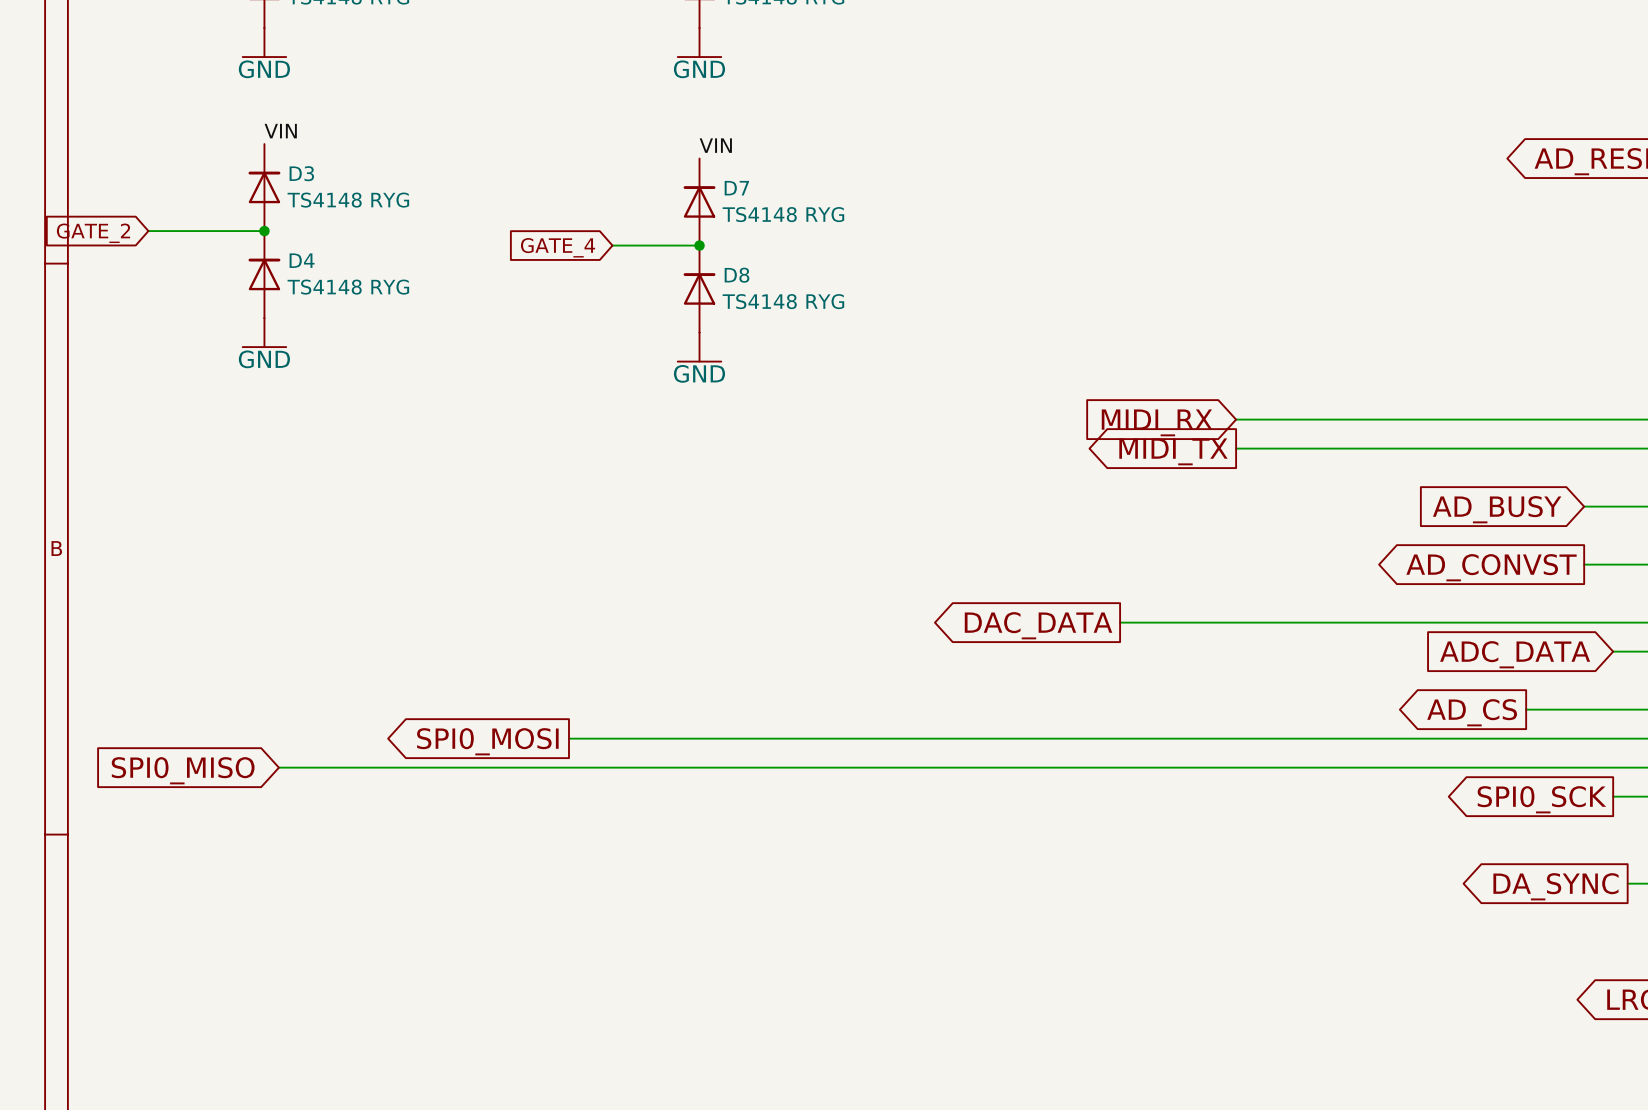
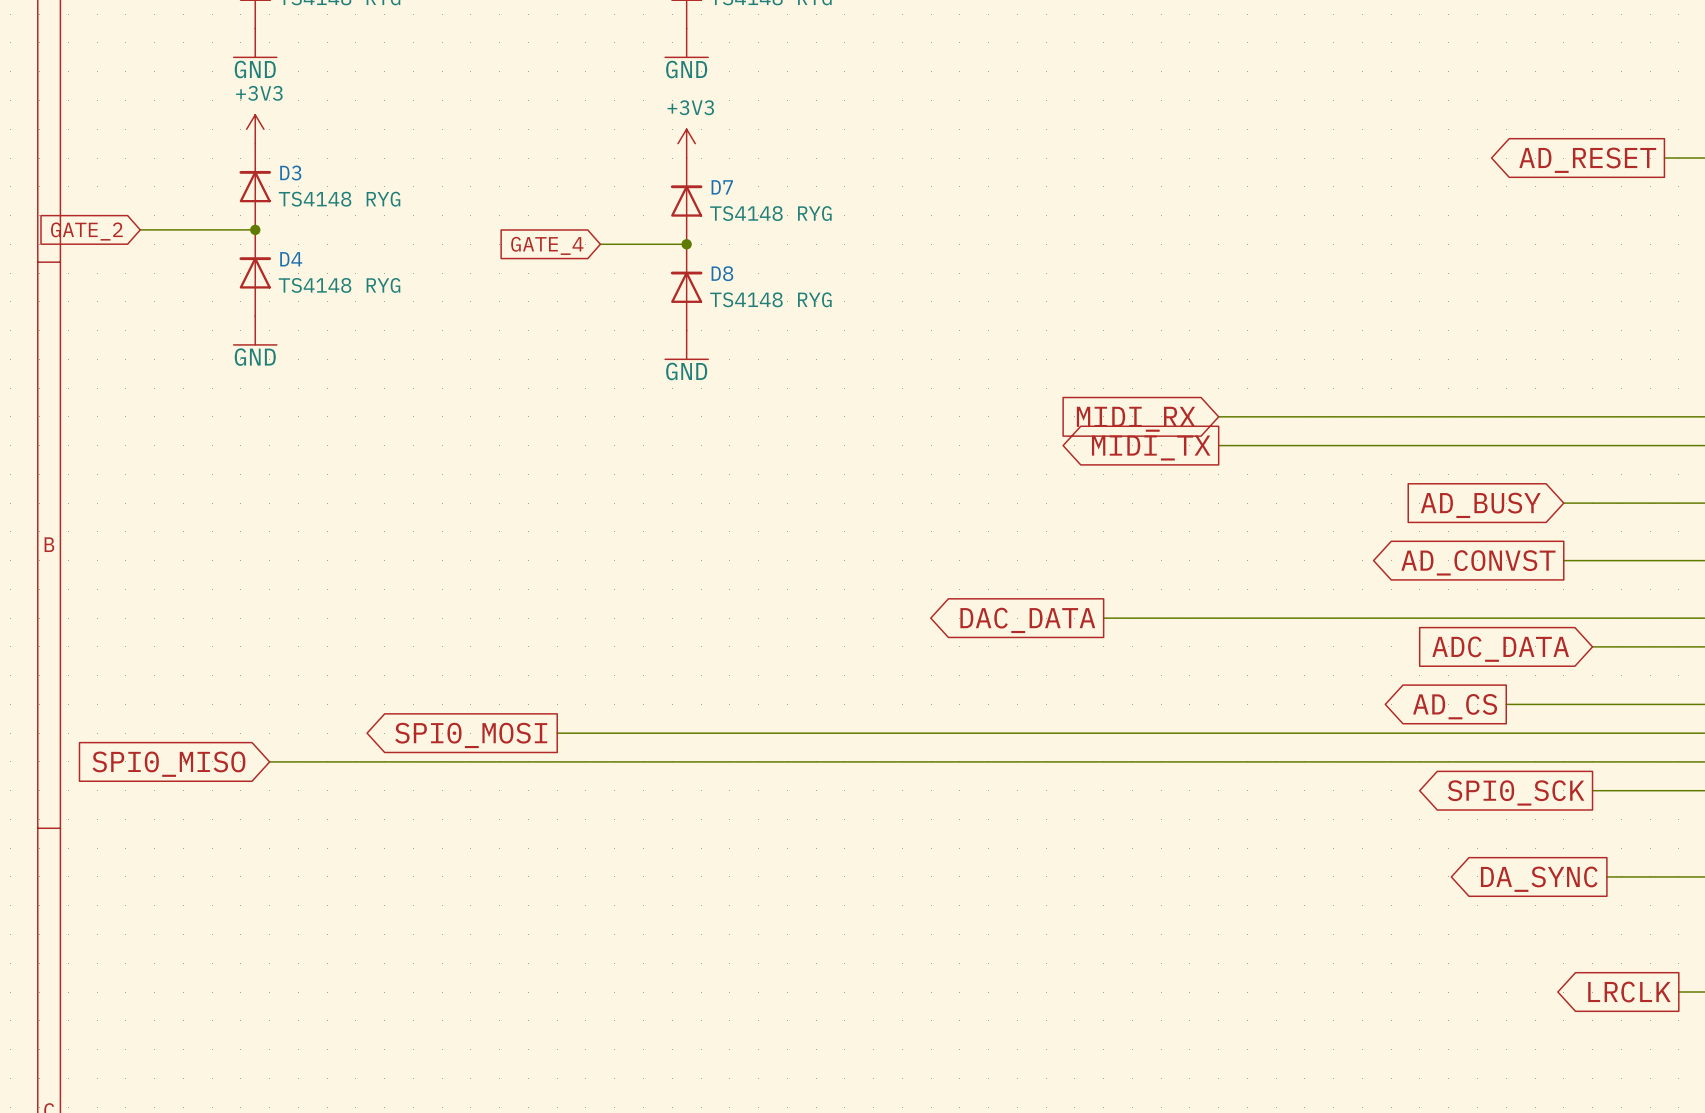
power symbol: none -> +3V3 (255, 129)
label: VIN (280, 131) -> none
power symbol: none -> +3V3 (686, 143)
label: VIN (715, 145) -> none

